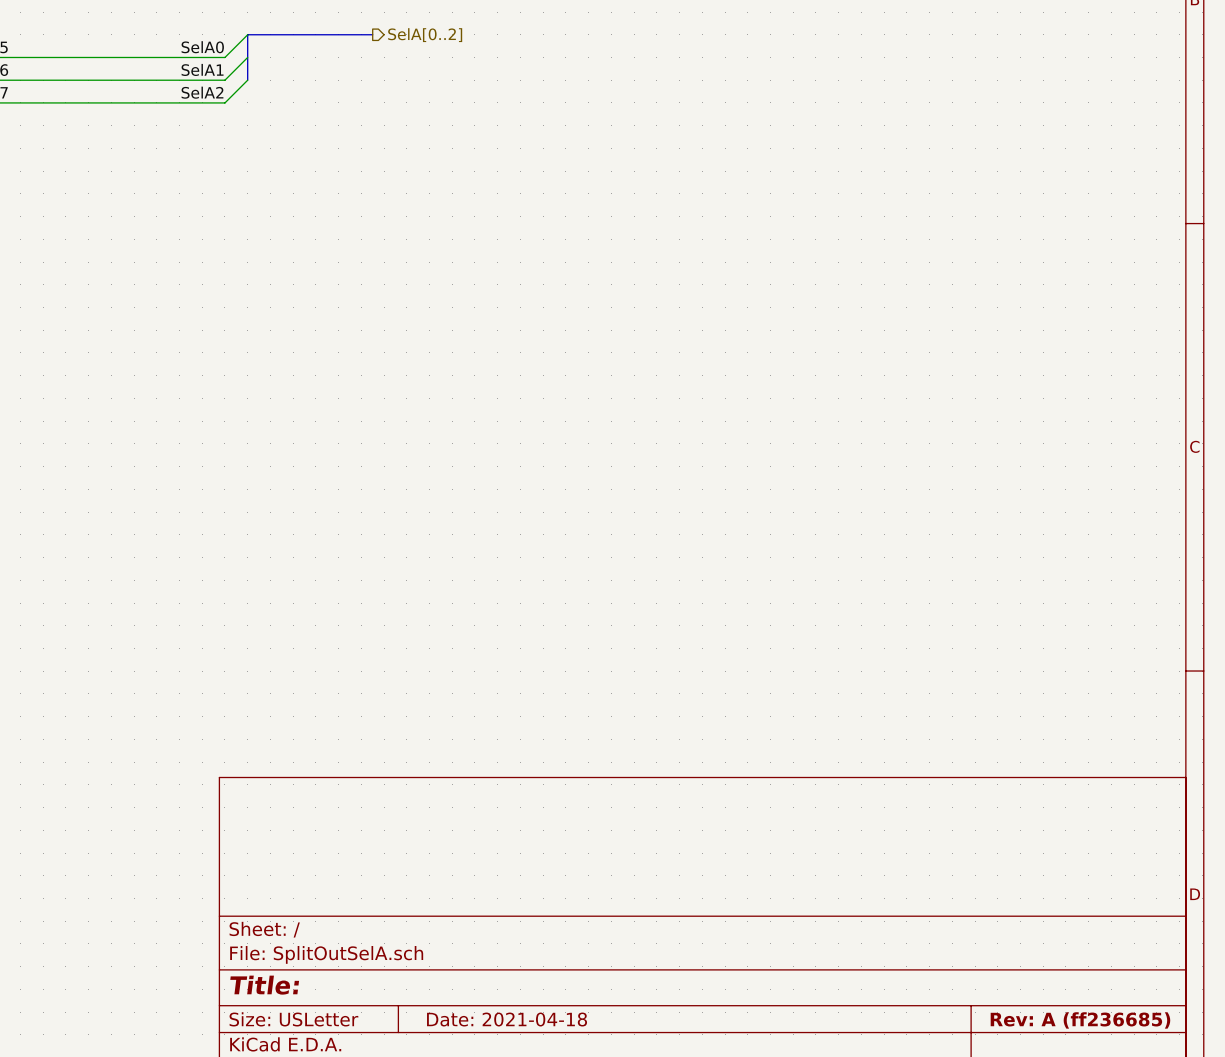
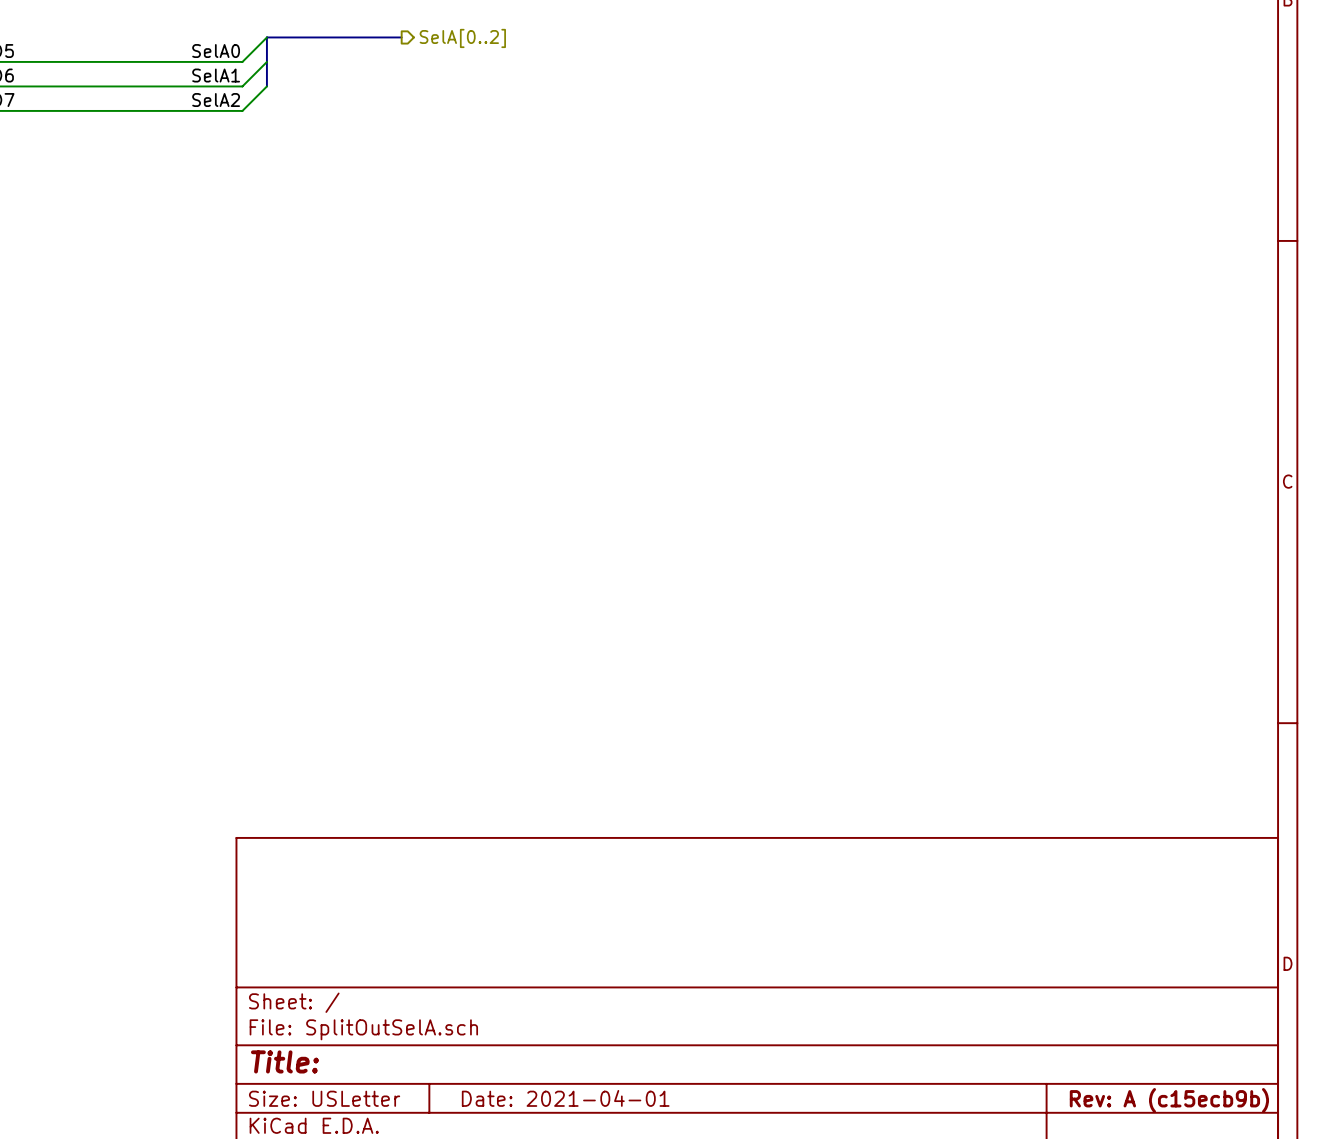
title block: Date: 2021-04-18 (507, 1019) -> Date: 2021-04-01 (565, 1098)
title block: Rev: A (ff236685) (1080, 1020) -> Rev: A (c15ecb9b) (1169, 1100)

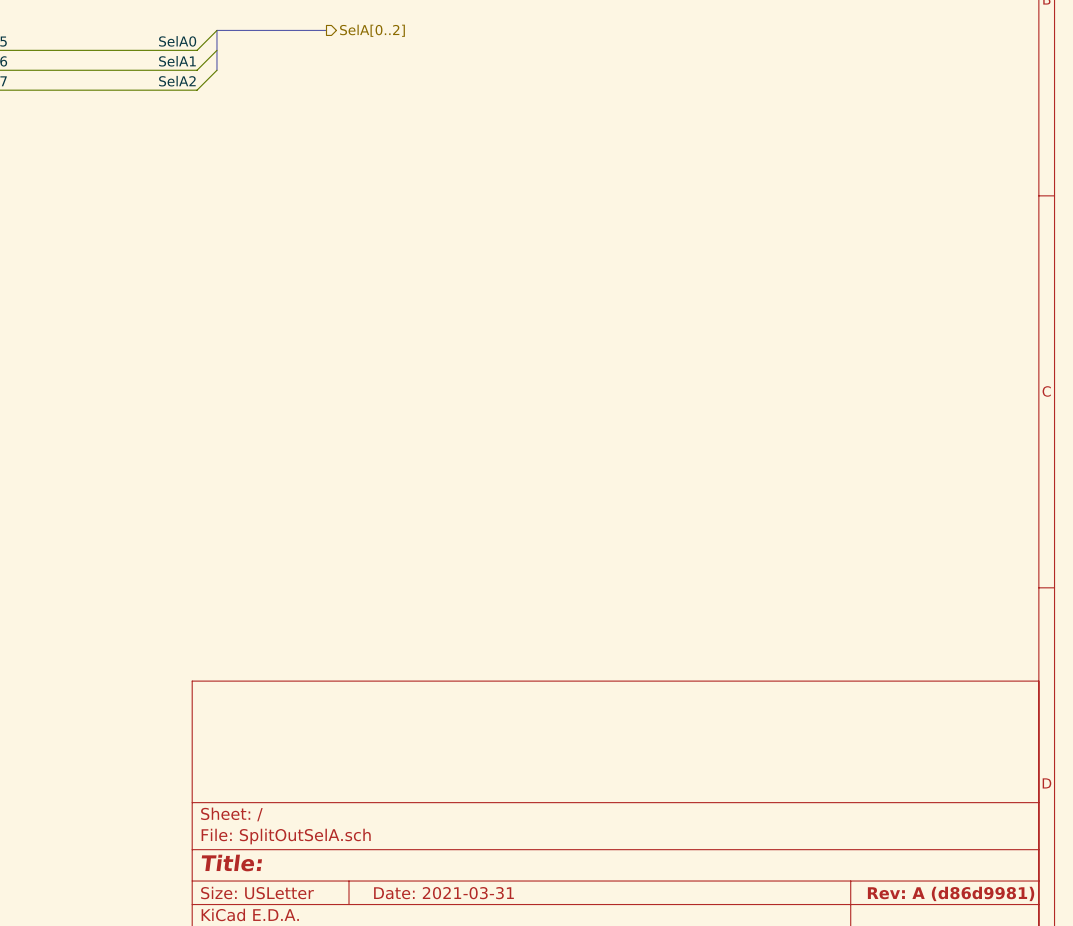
title block: Date: 2021-04-01 (565, 1098) -> Date: 2021-03-31 (443, 893)
title block: Rev: A (c15ecb9b) (1169, 1100) -> Rev: A (d86d9981) (951, 893)

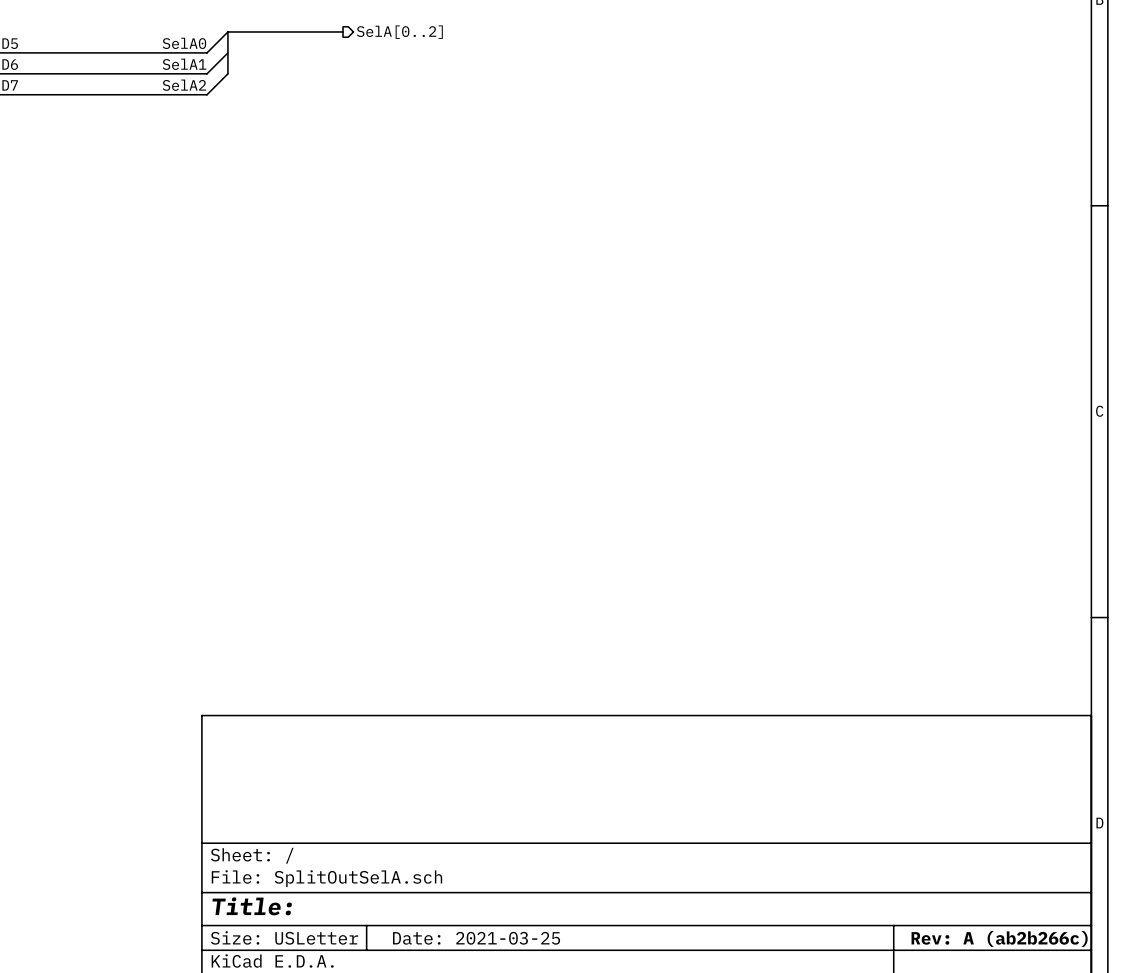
title block: Date: 2021-03-31 (443, 893) -> Date: 2021-03-25 (476, 938)
title block: Rev: A (d86d9981) (951, 893) -> Rev: A (ab2b266c) (999, 938)

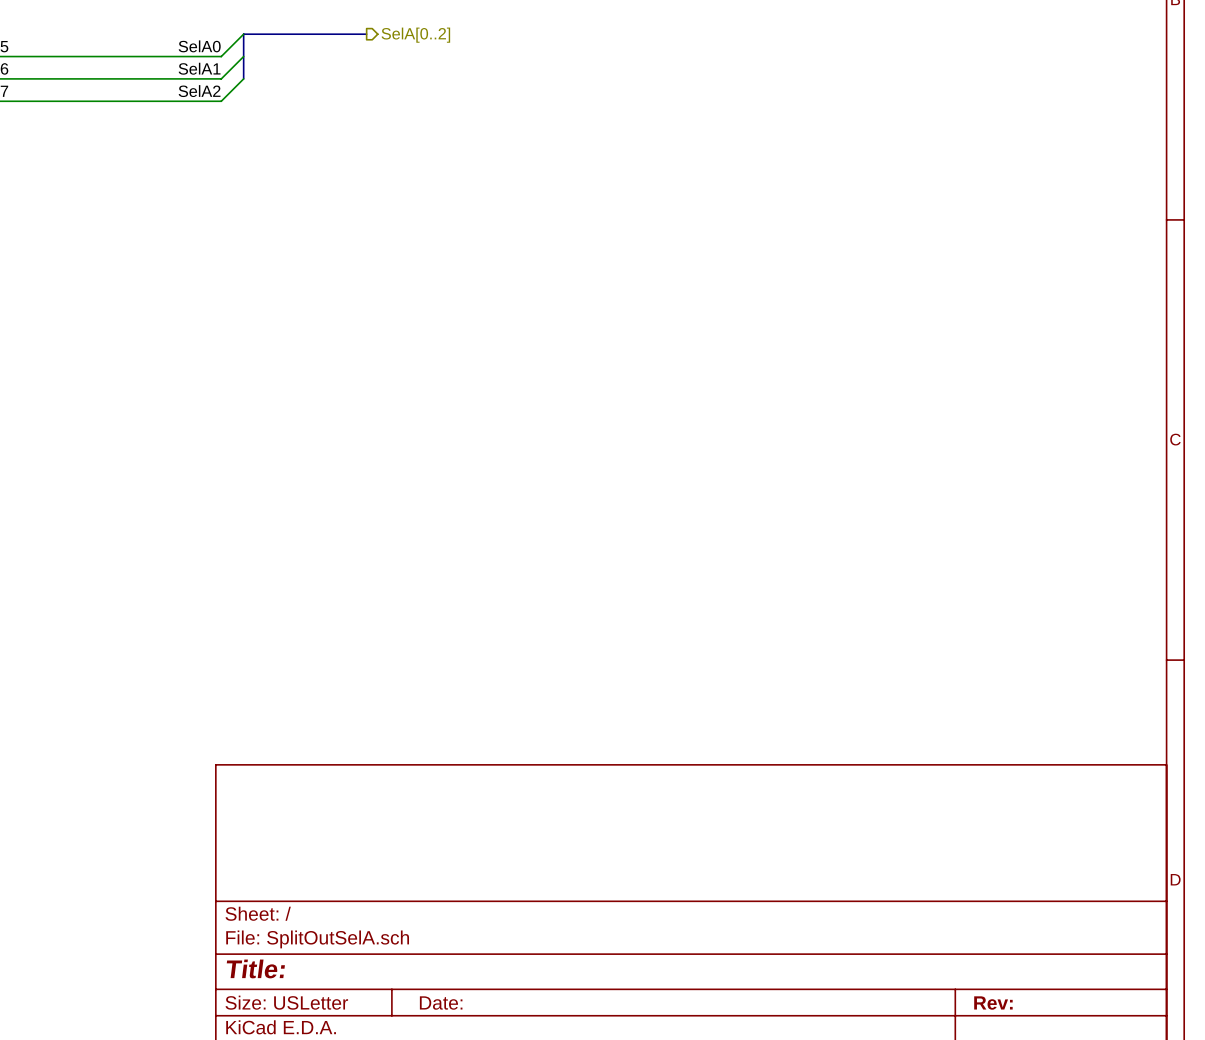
title block: Date: 2021-03-25 (476, 938) -> Date: (441, 1003)
title block: Rev: A (ab2b266c) (999, 938) -> Rev: (993, 1003)

